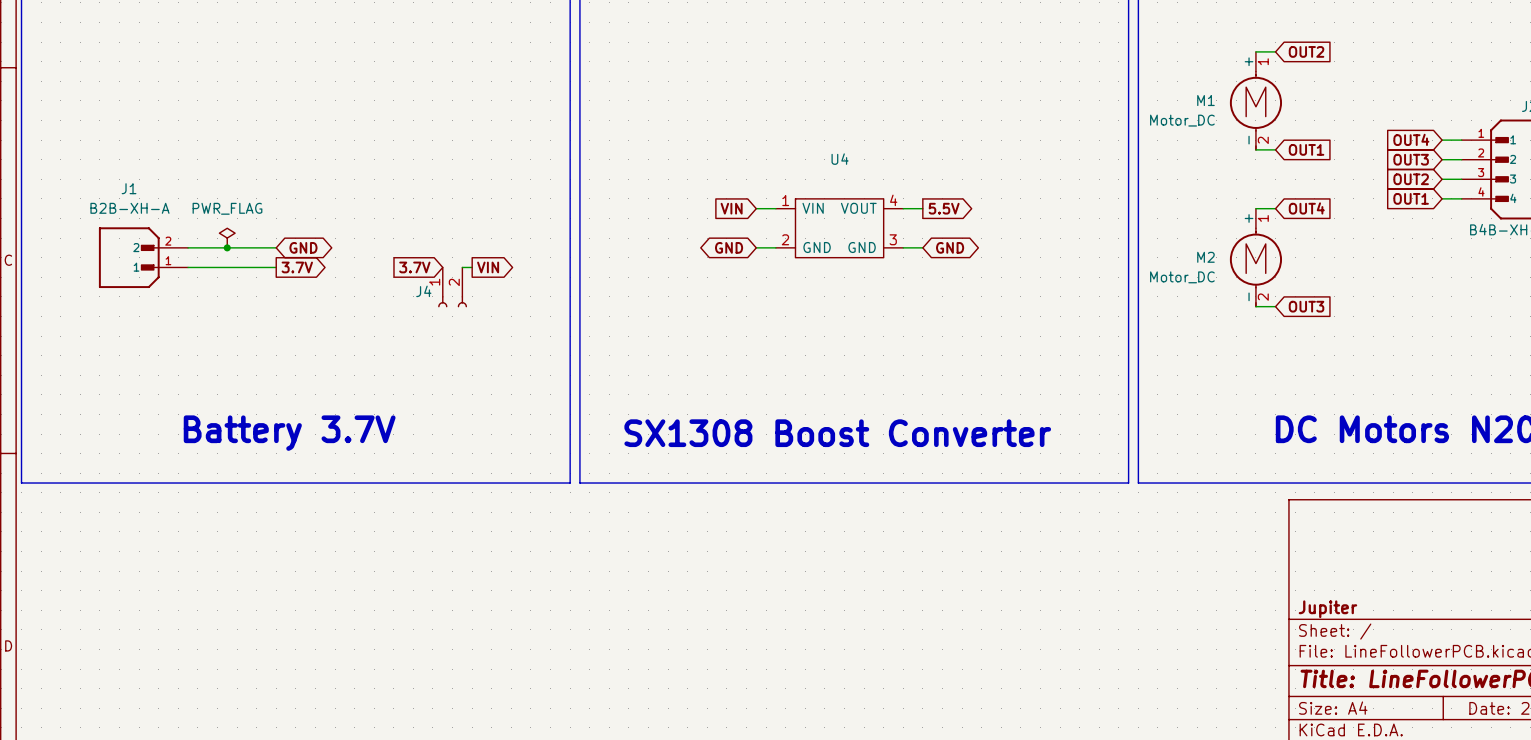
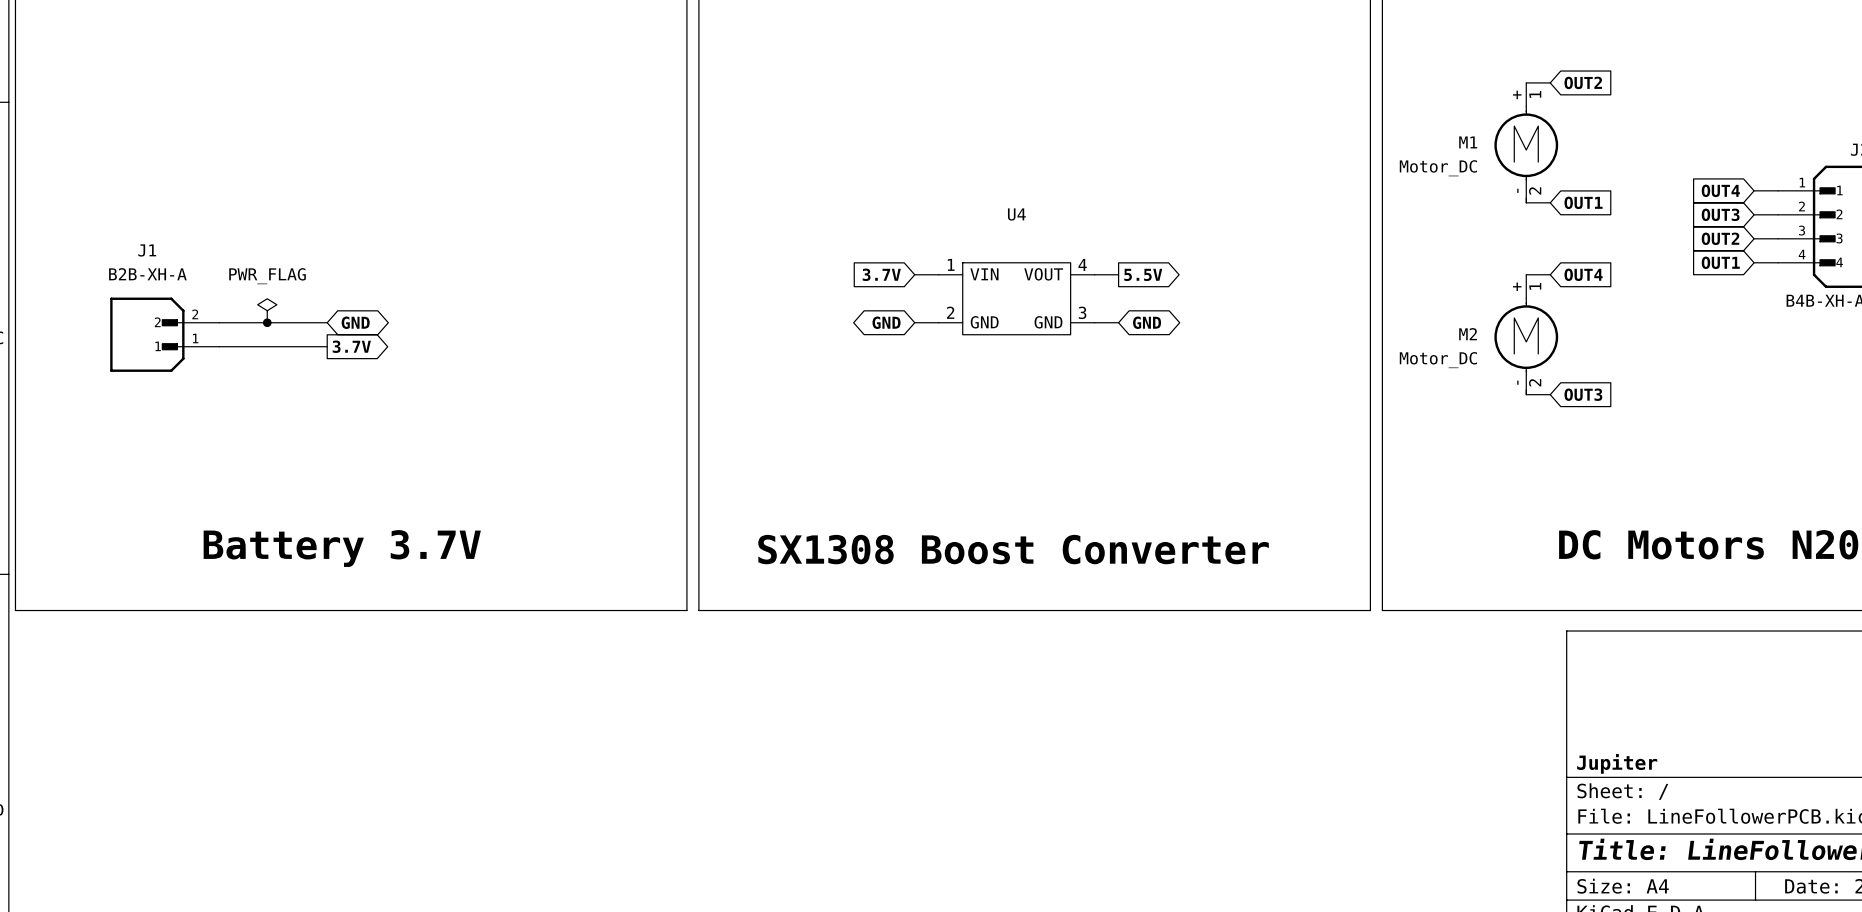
global label: VIN (731, 208) -> 3.7V (881, 274)
global label: 3.7V (414, 267) -> none
wire: (462, 267) (472, 267) -> none
global label: VIN (488, 267) -> none
J4: (452, 287) -> none

